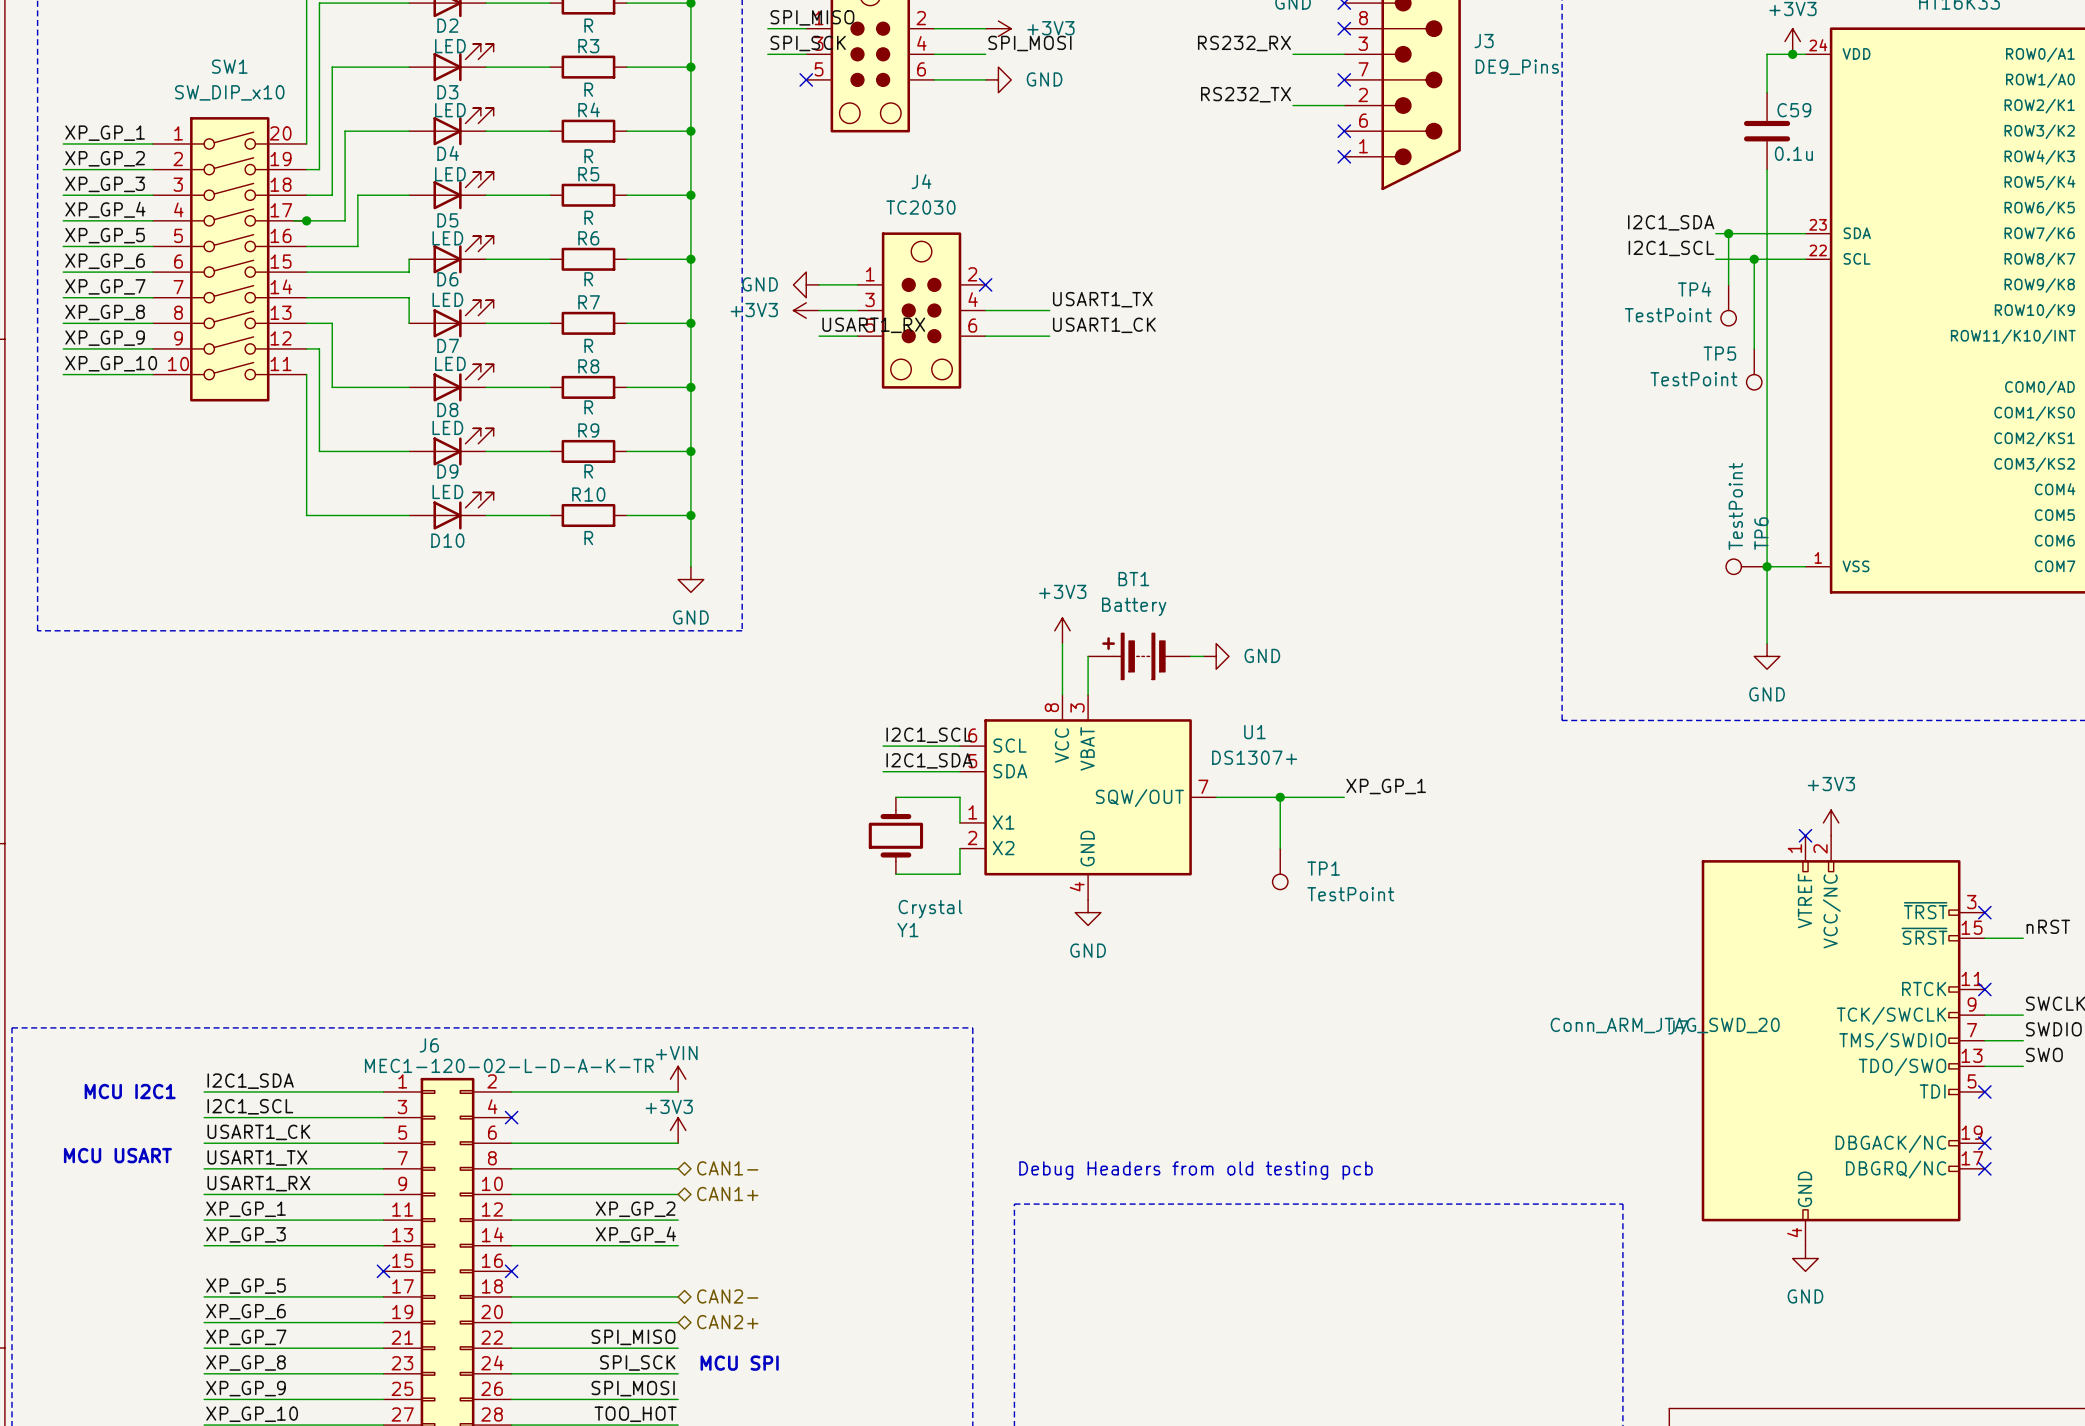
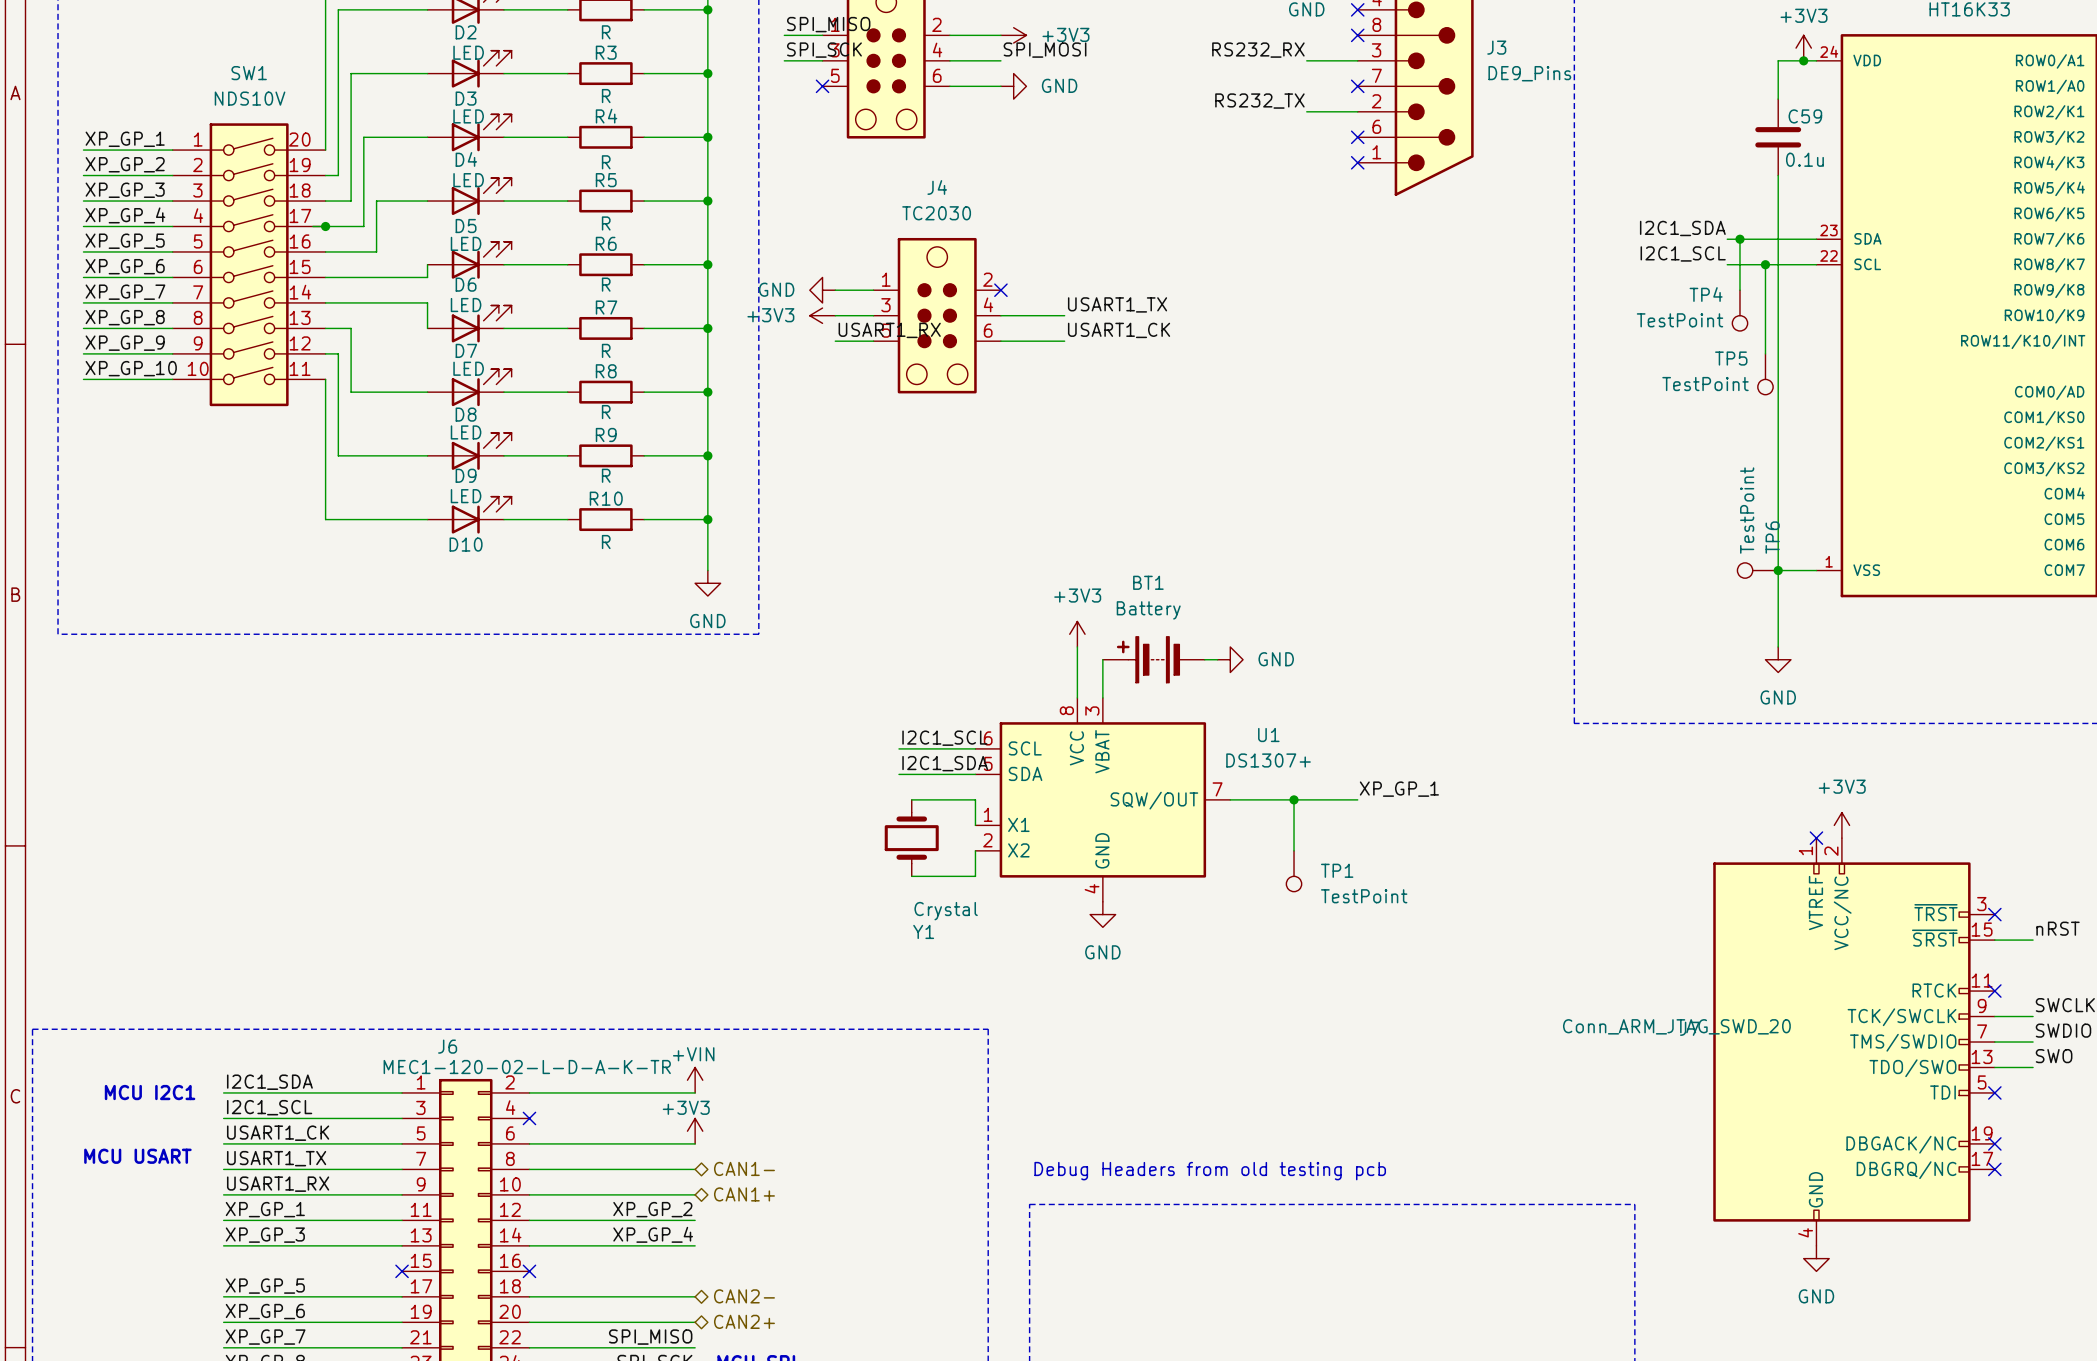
SW1 value: SW_DIP_x10 (229, 92) -> NDS10V (250, 98)

